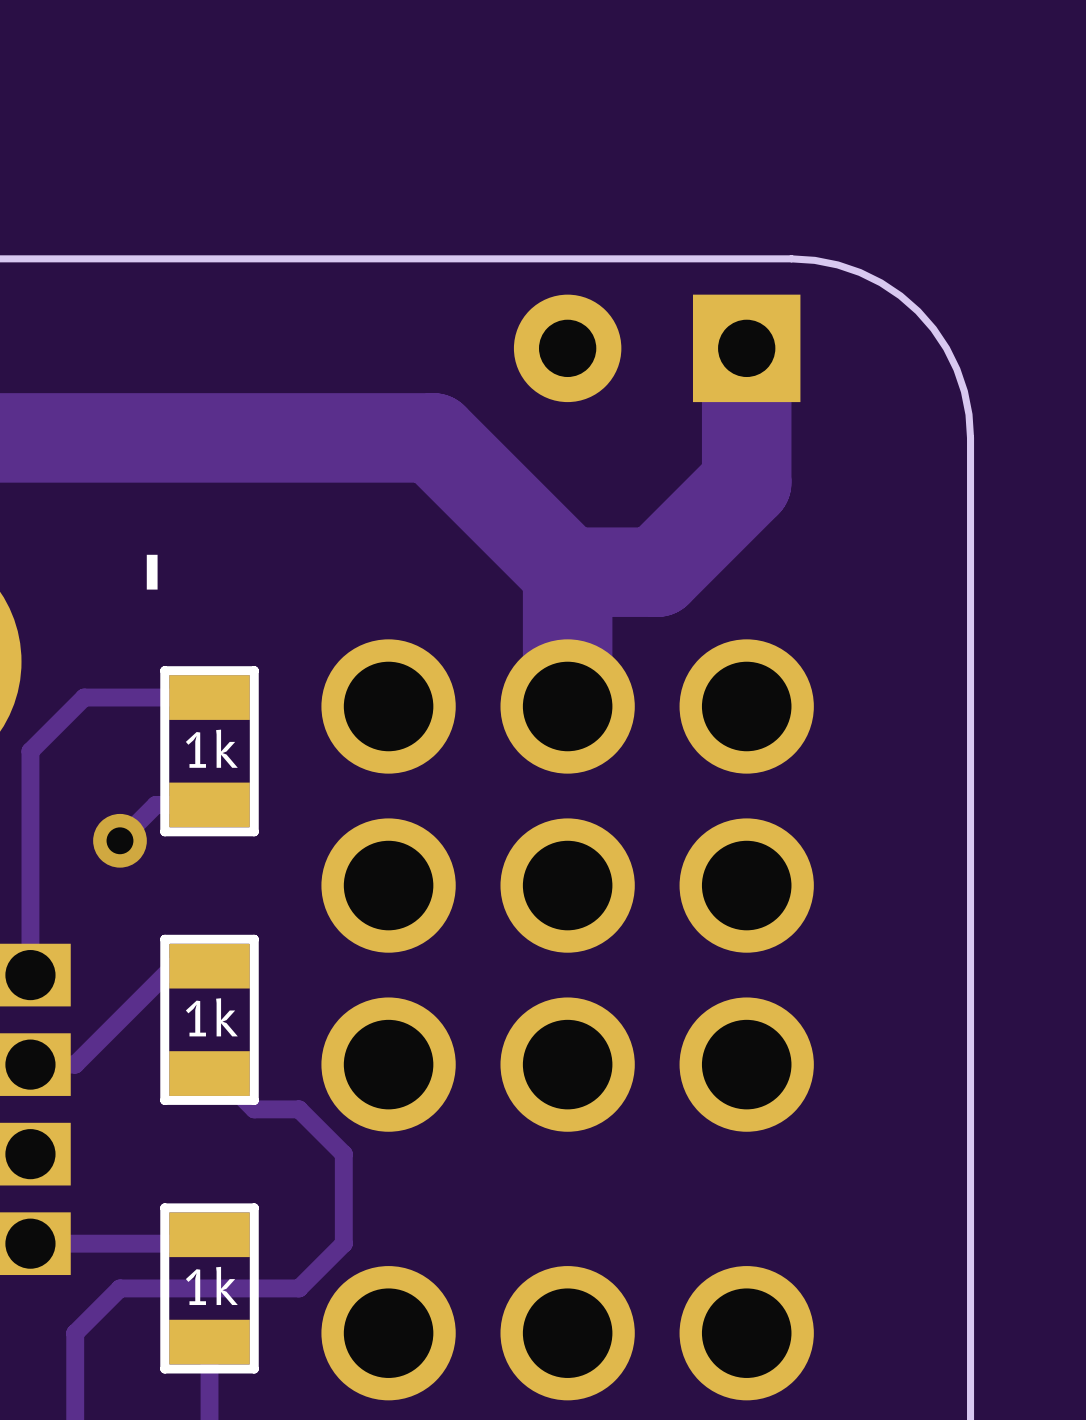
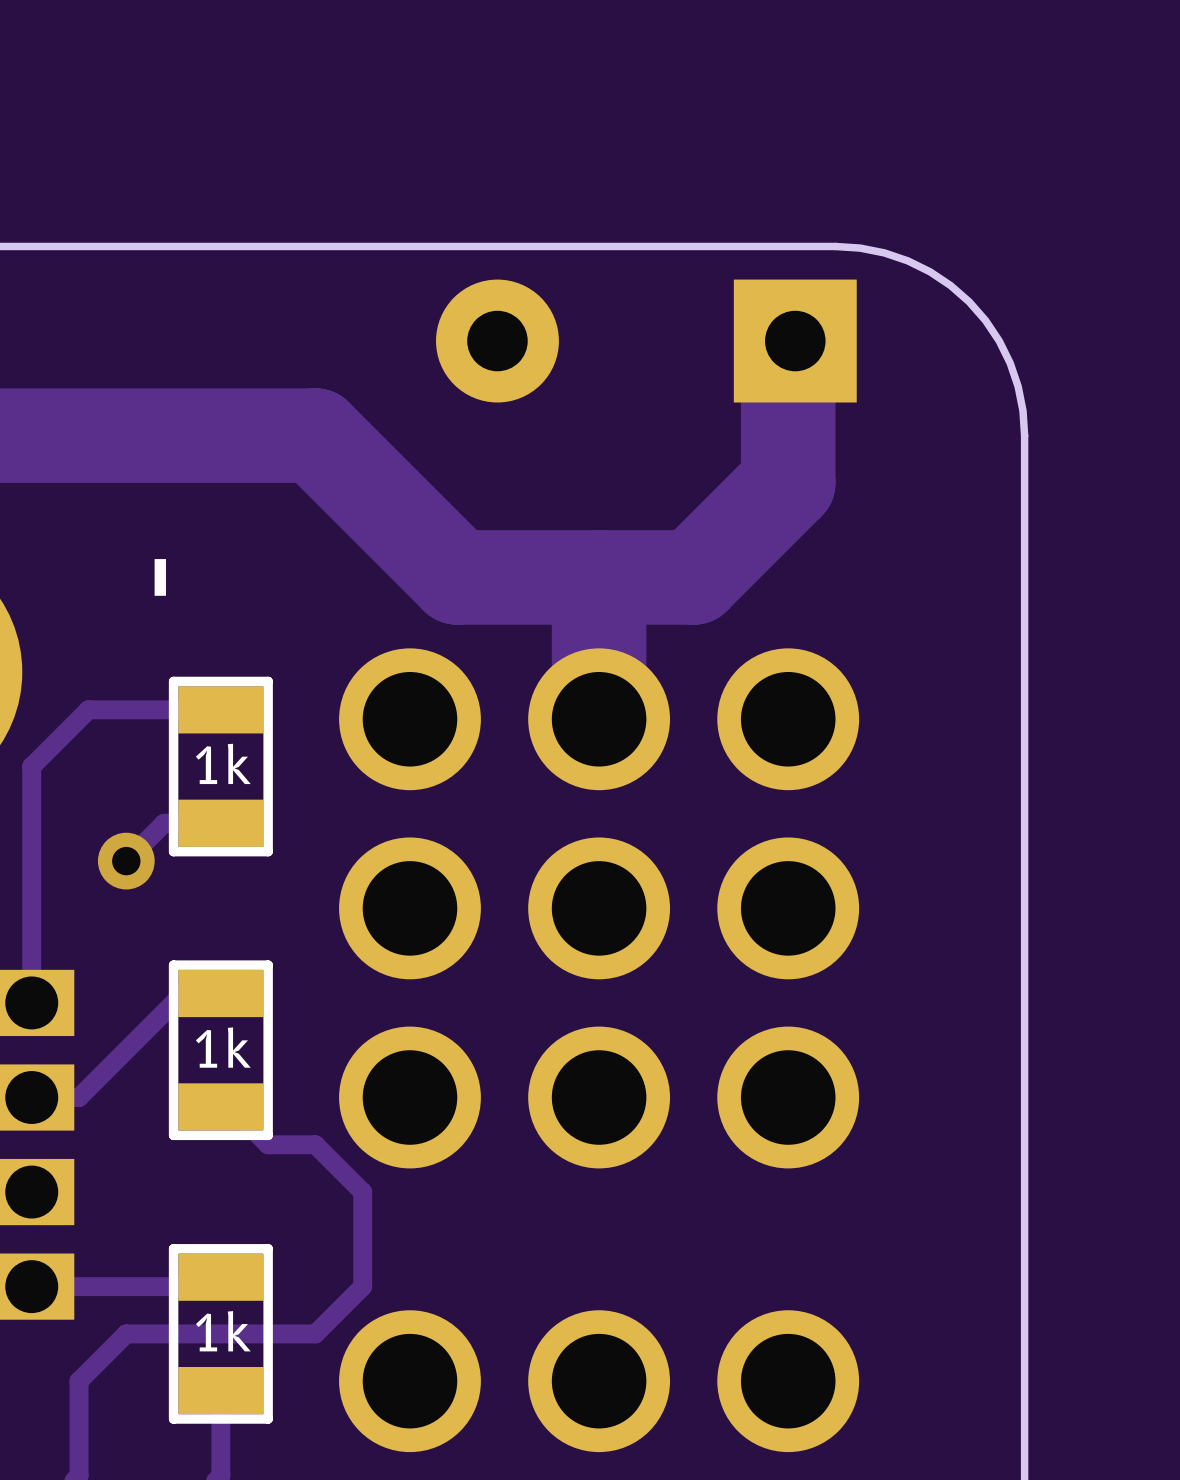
part footprint: [513, 294, 801, 403] -> [436, 279, 857, 403]
track: (299, 437) (433, 437) (567, 572) -> (315, 435) (457, 577) (599, 577)

